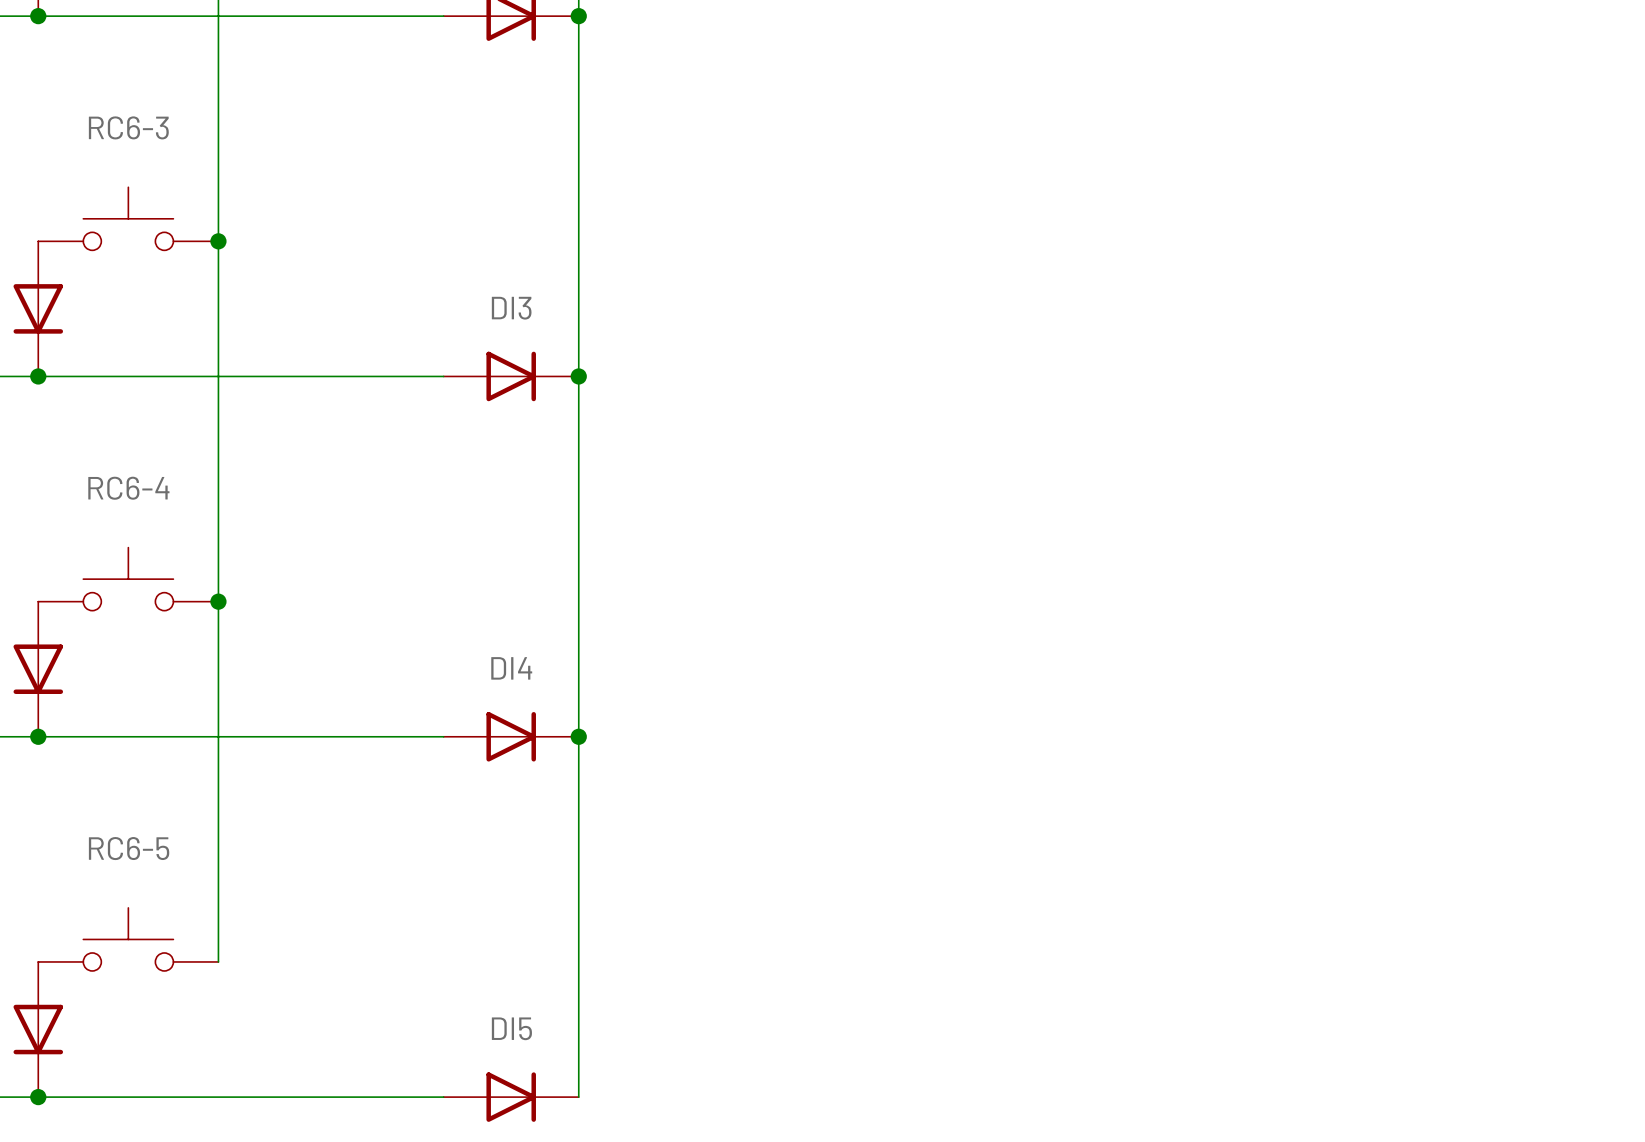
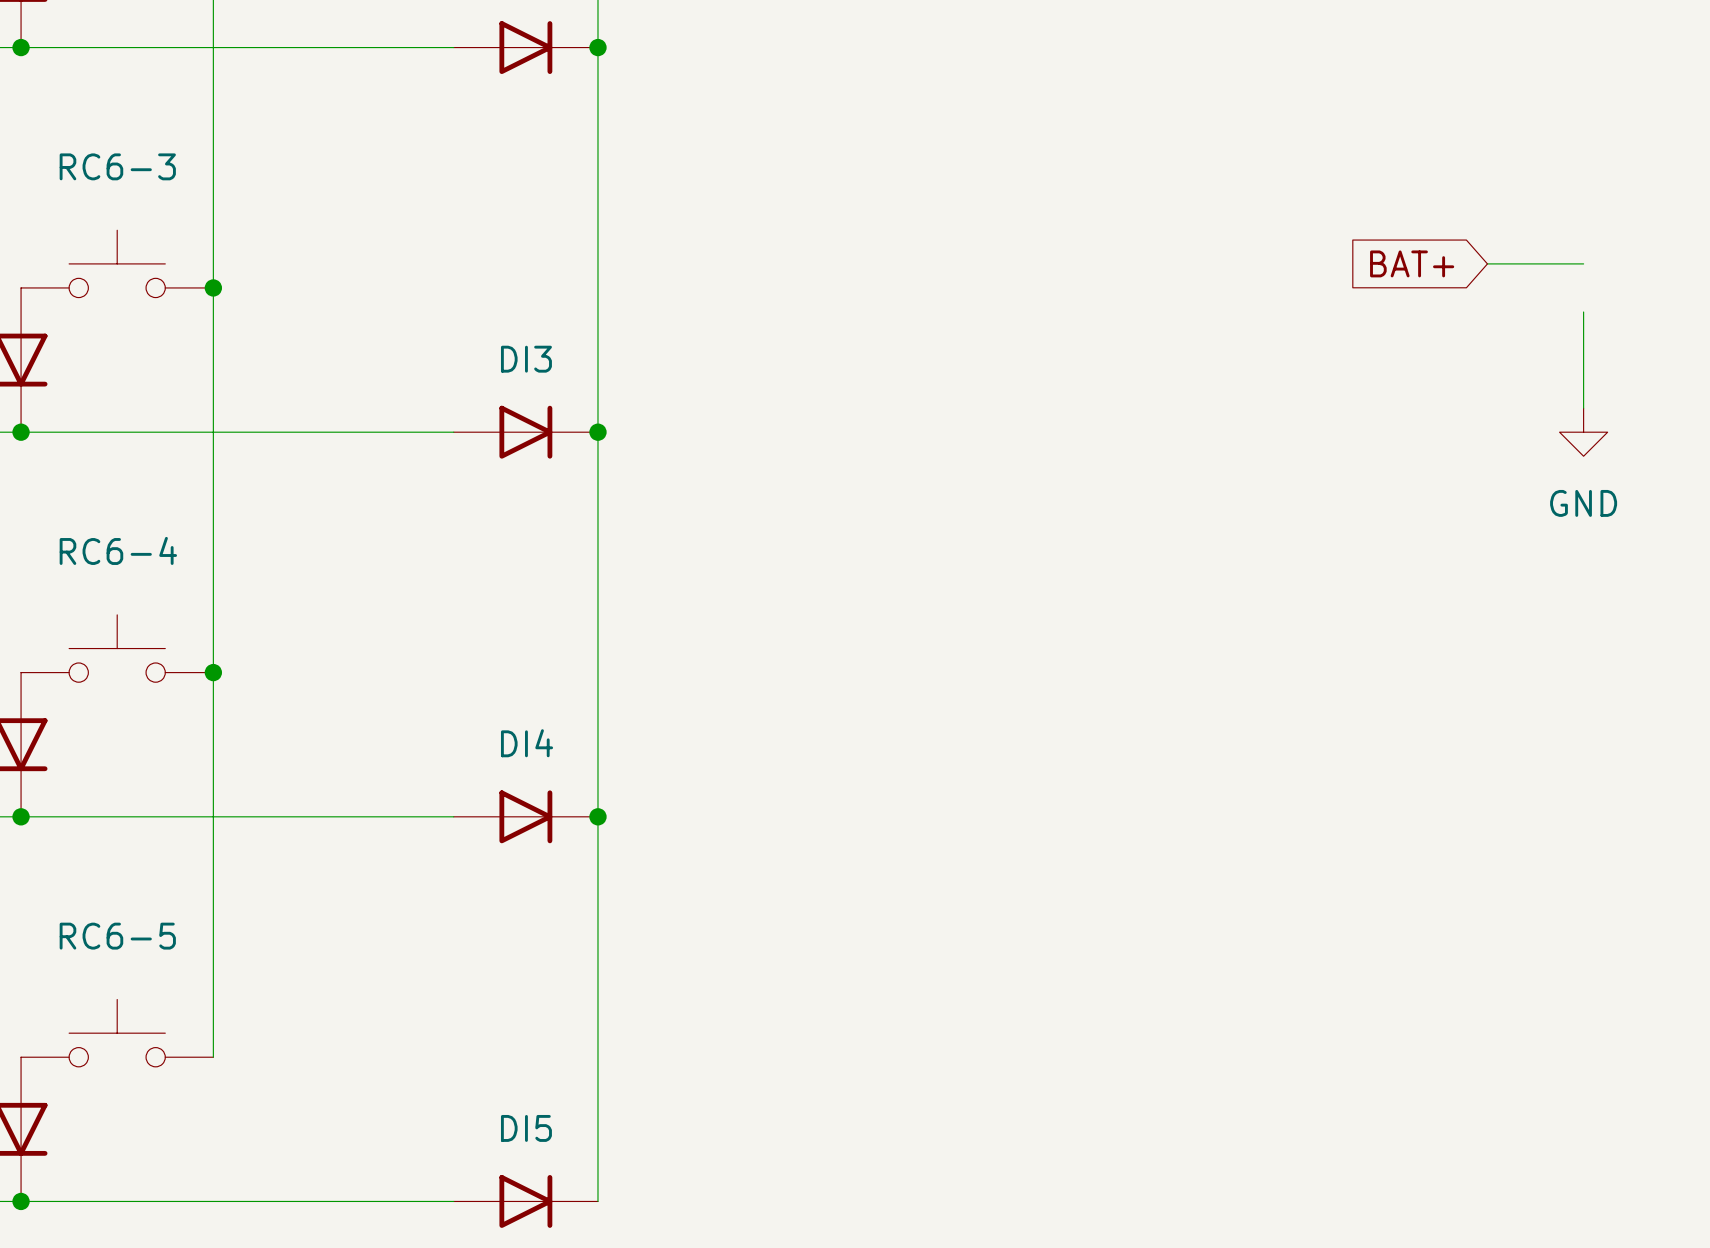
global label: none -> BAT+ (1412, 263)
wire: none -> (1487, 263) (1583, 263)
wire: none -> (1583, 312) (1583, 408)
power symbol: none -> GND (1583, 432)

